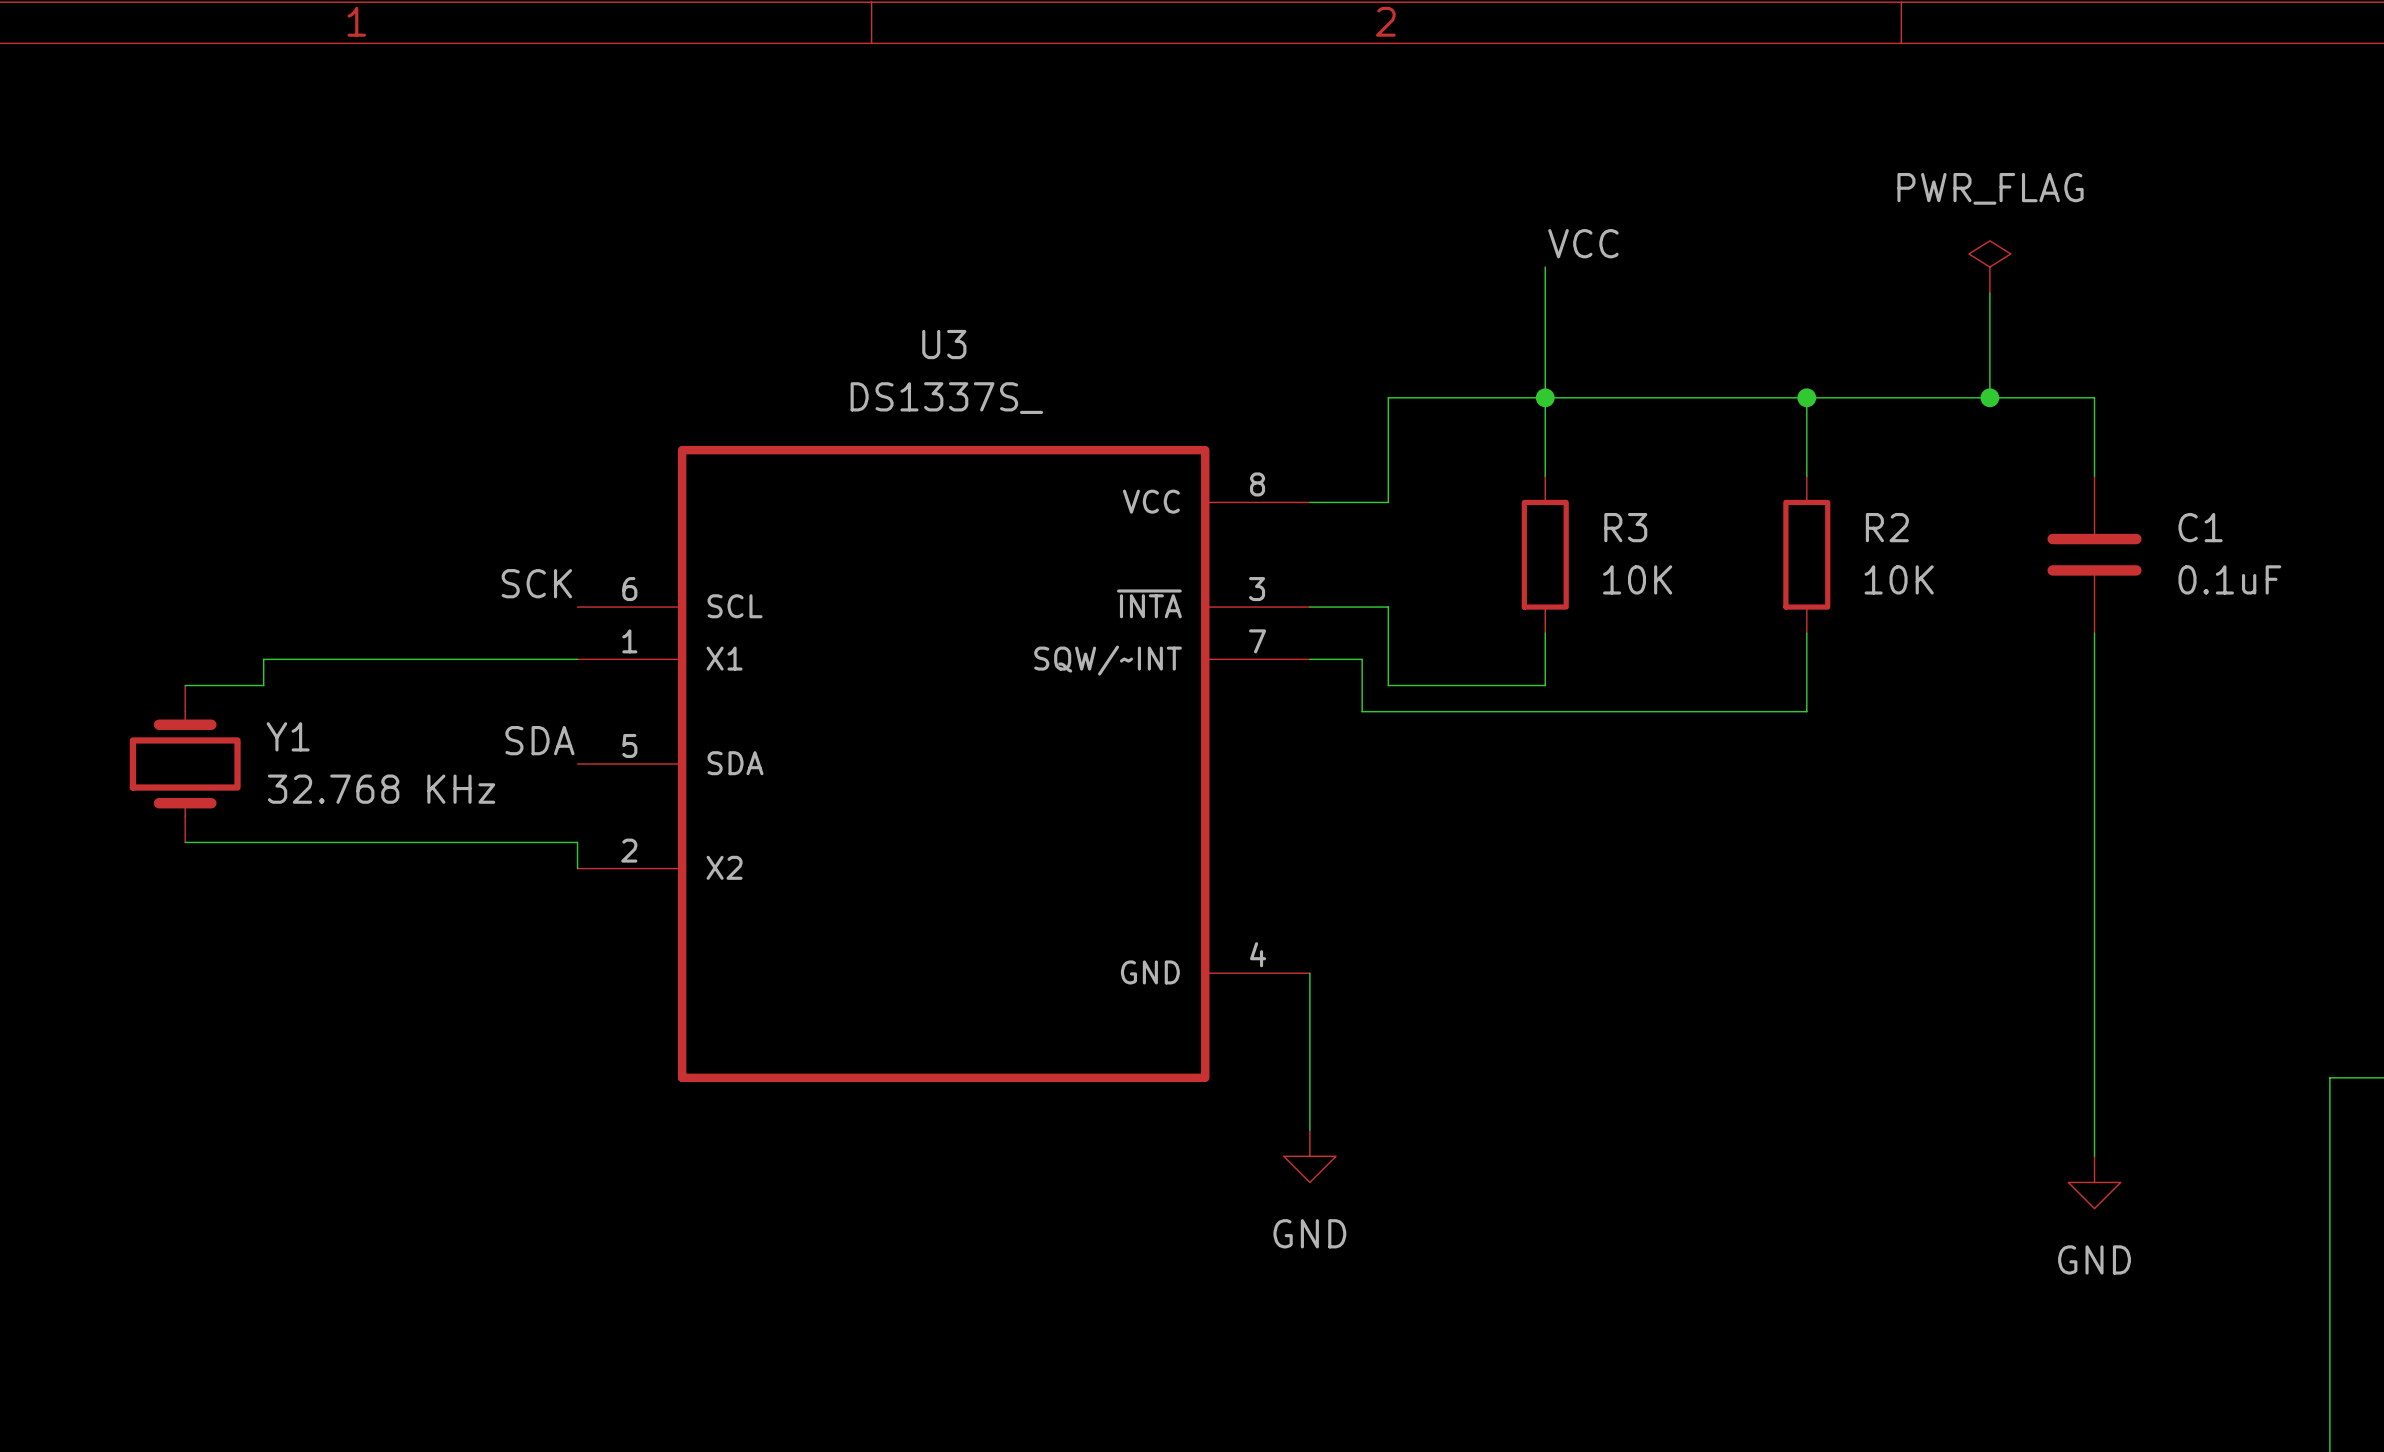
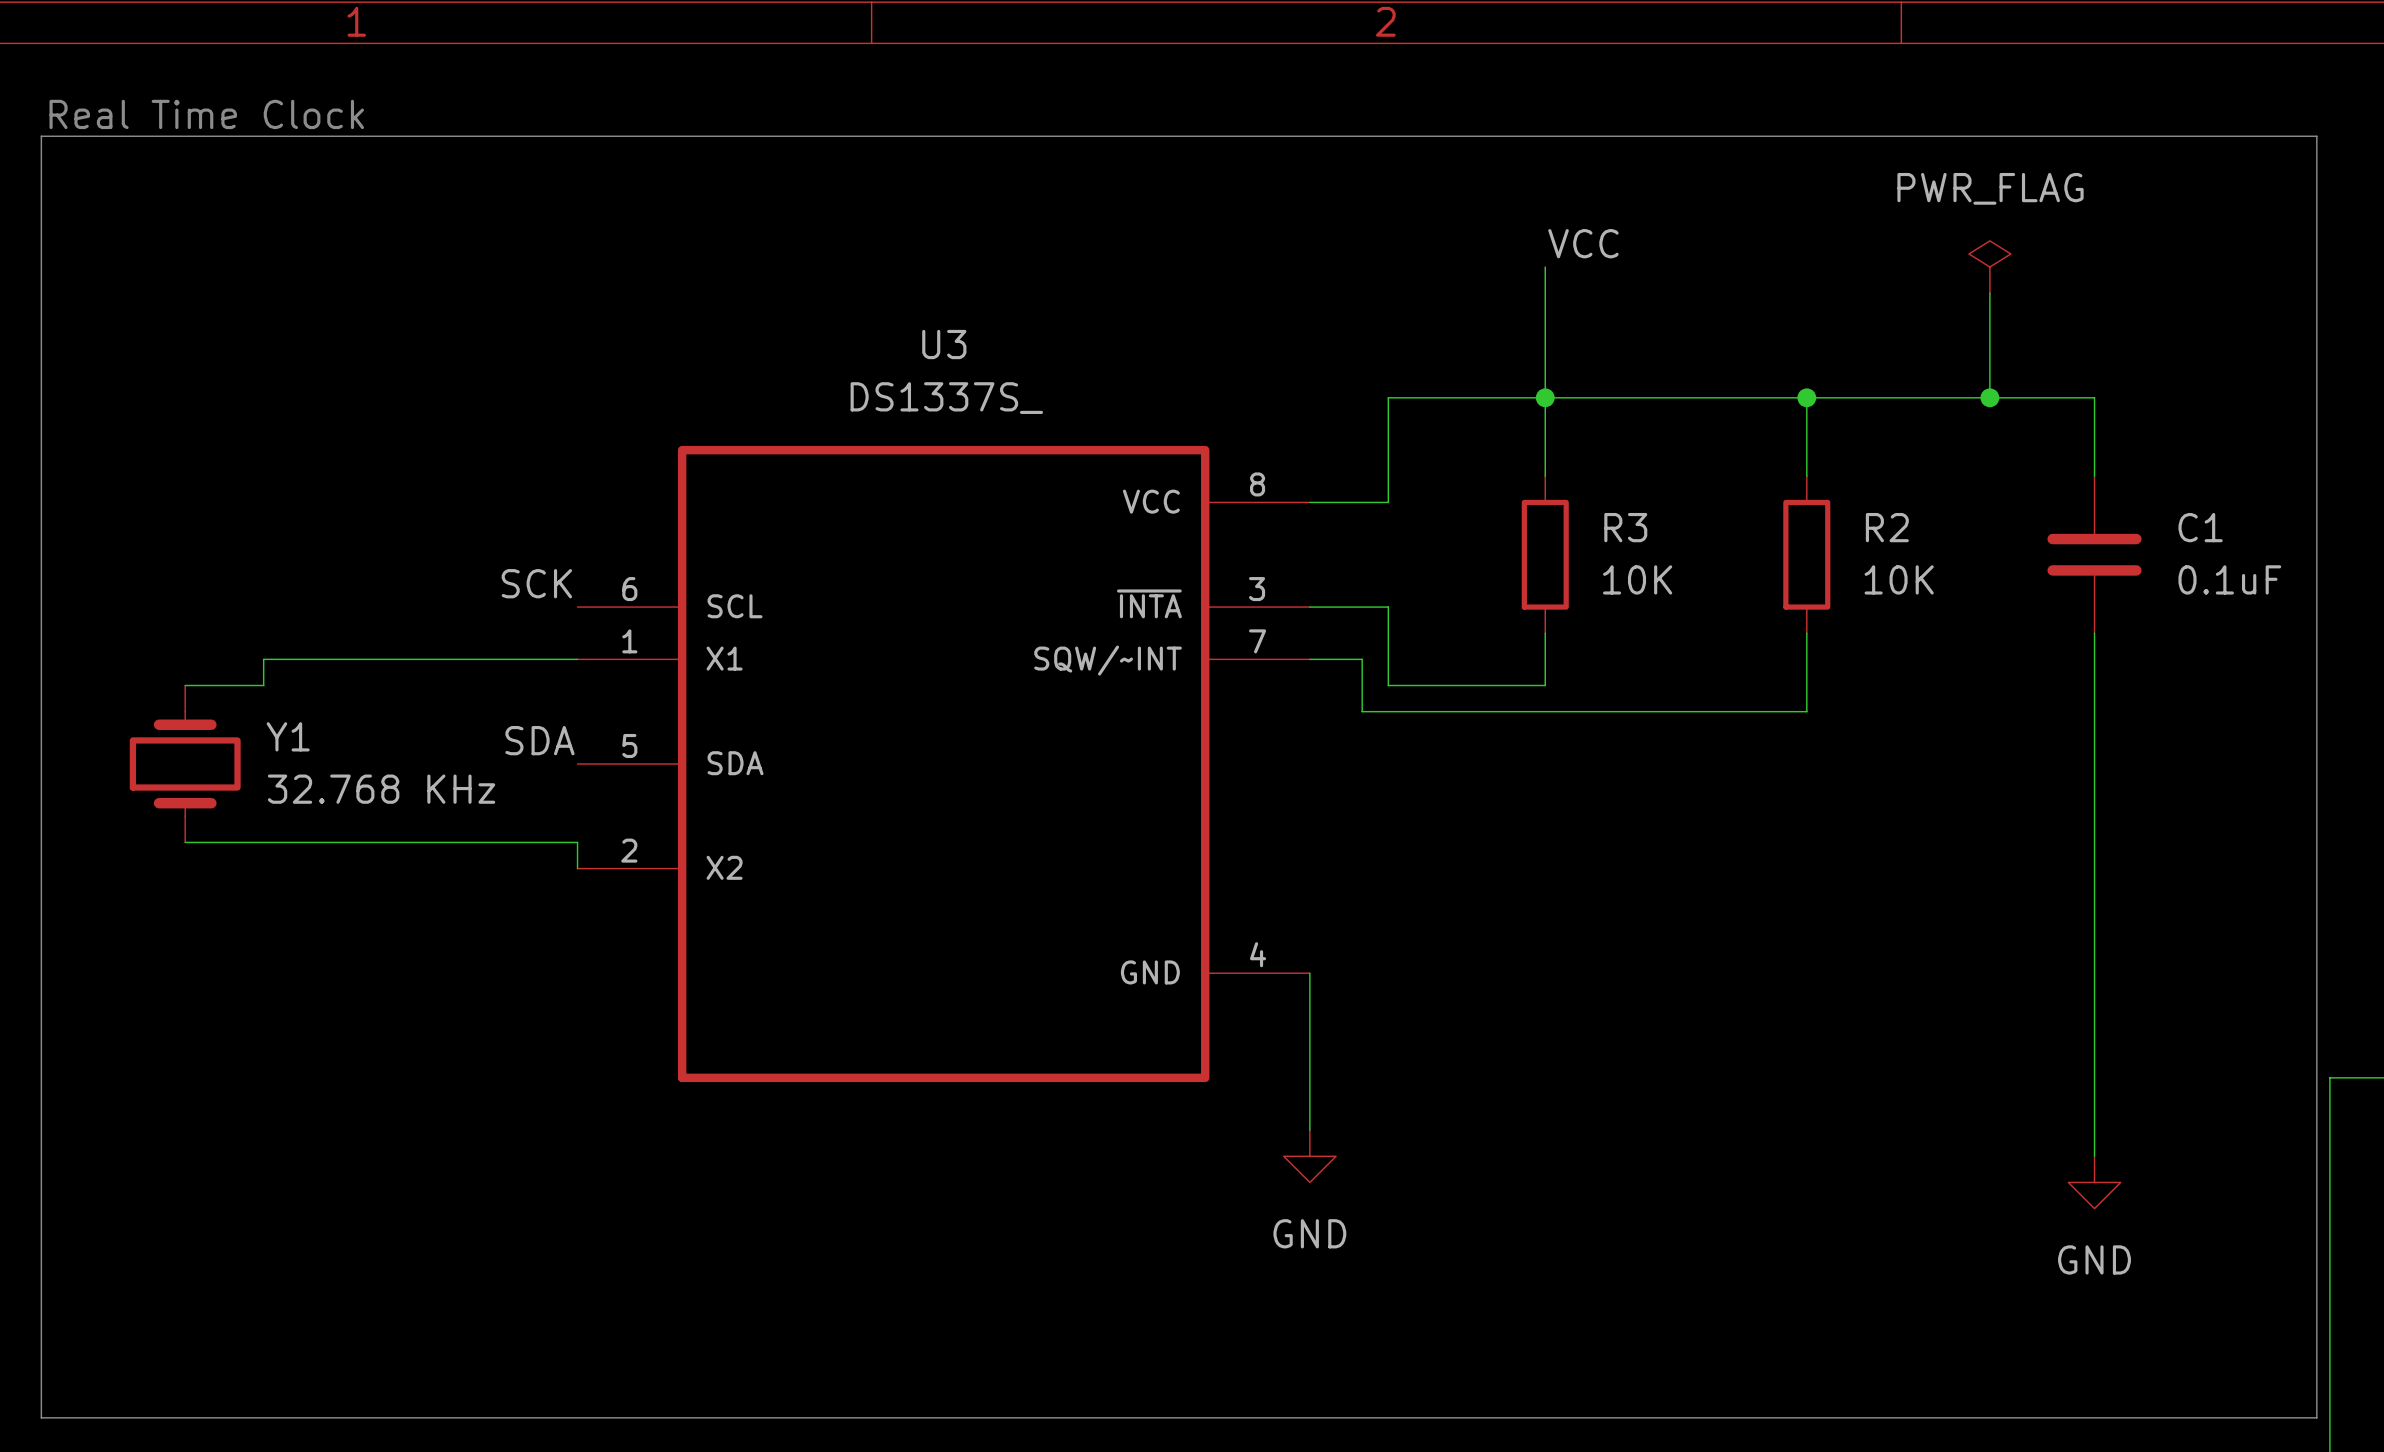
text: none -> Real Time Clock (206, 114)
line: none -> (41, 136) (2316, 136) (2316, 1417) (41, 1417) (41, 136)

